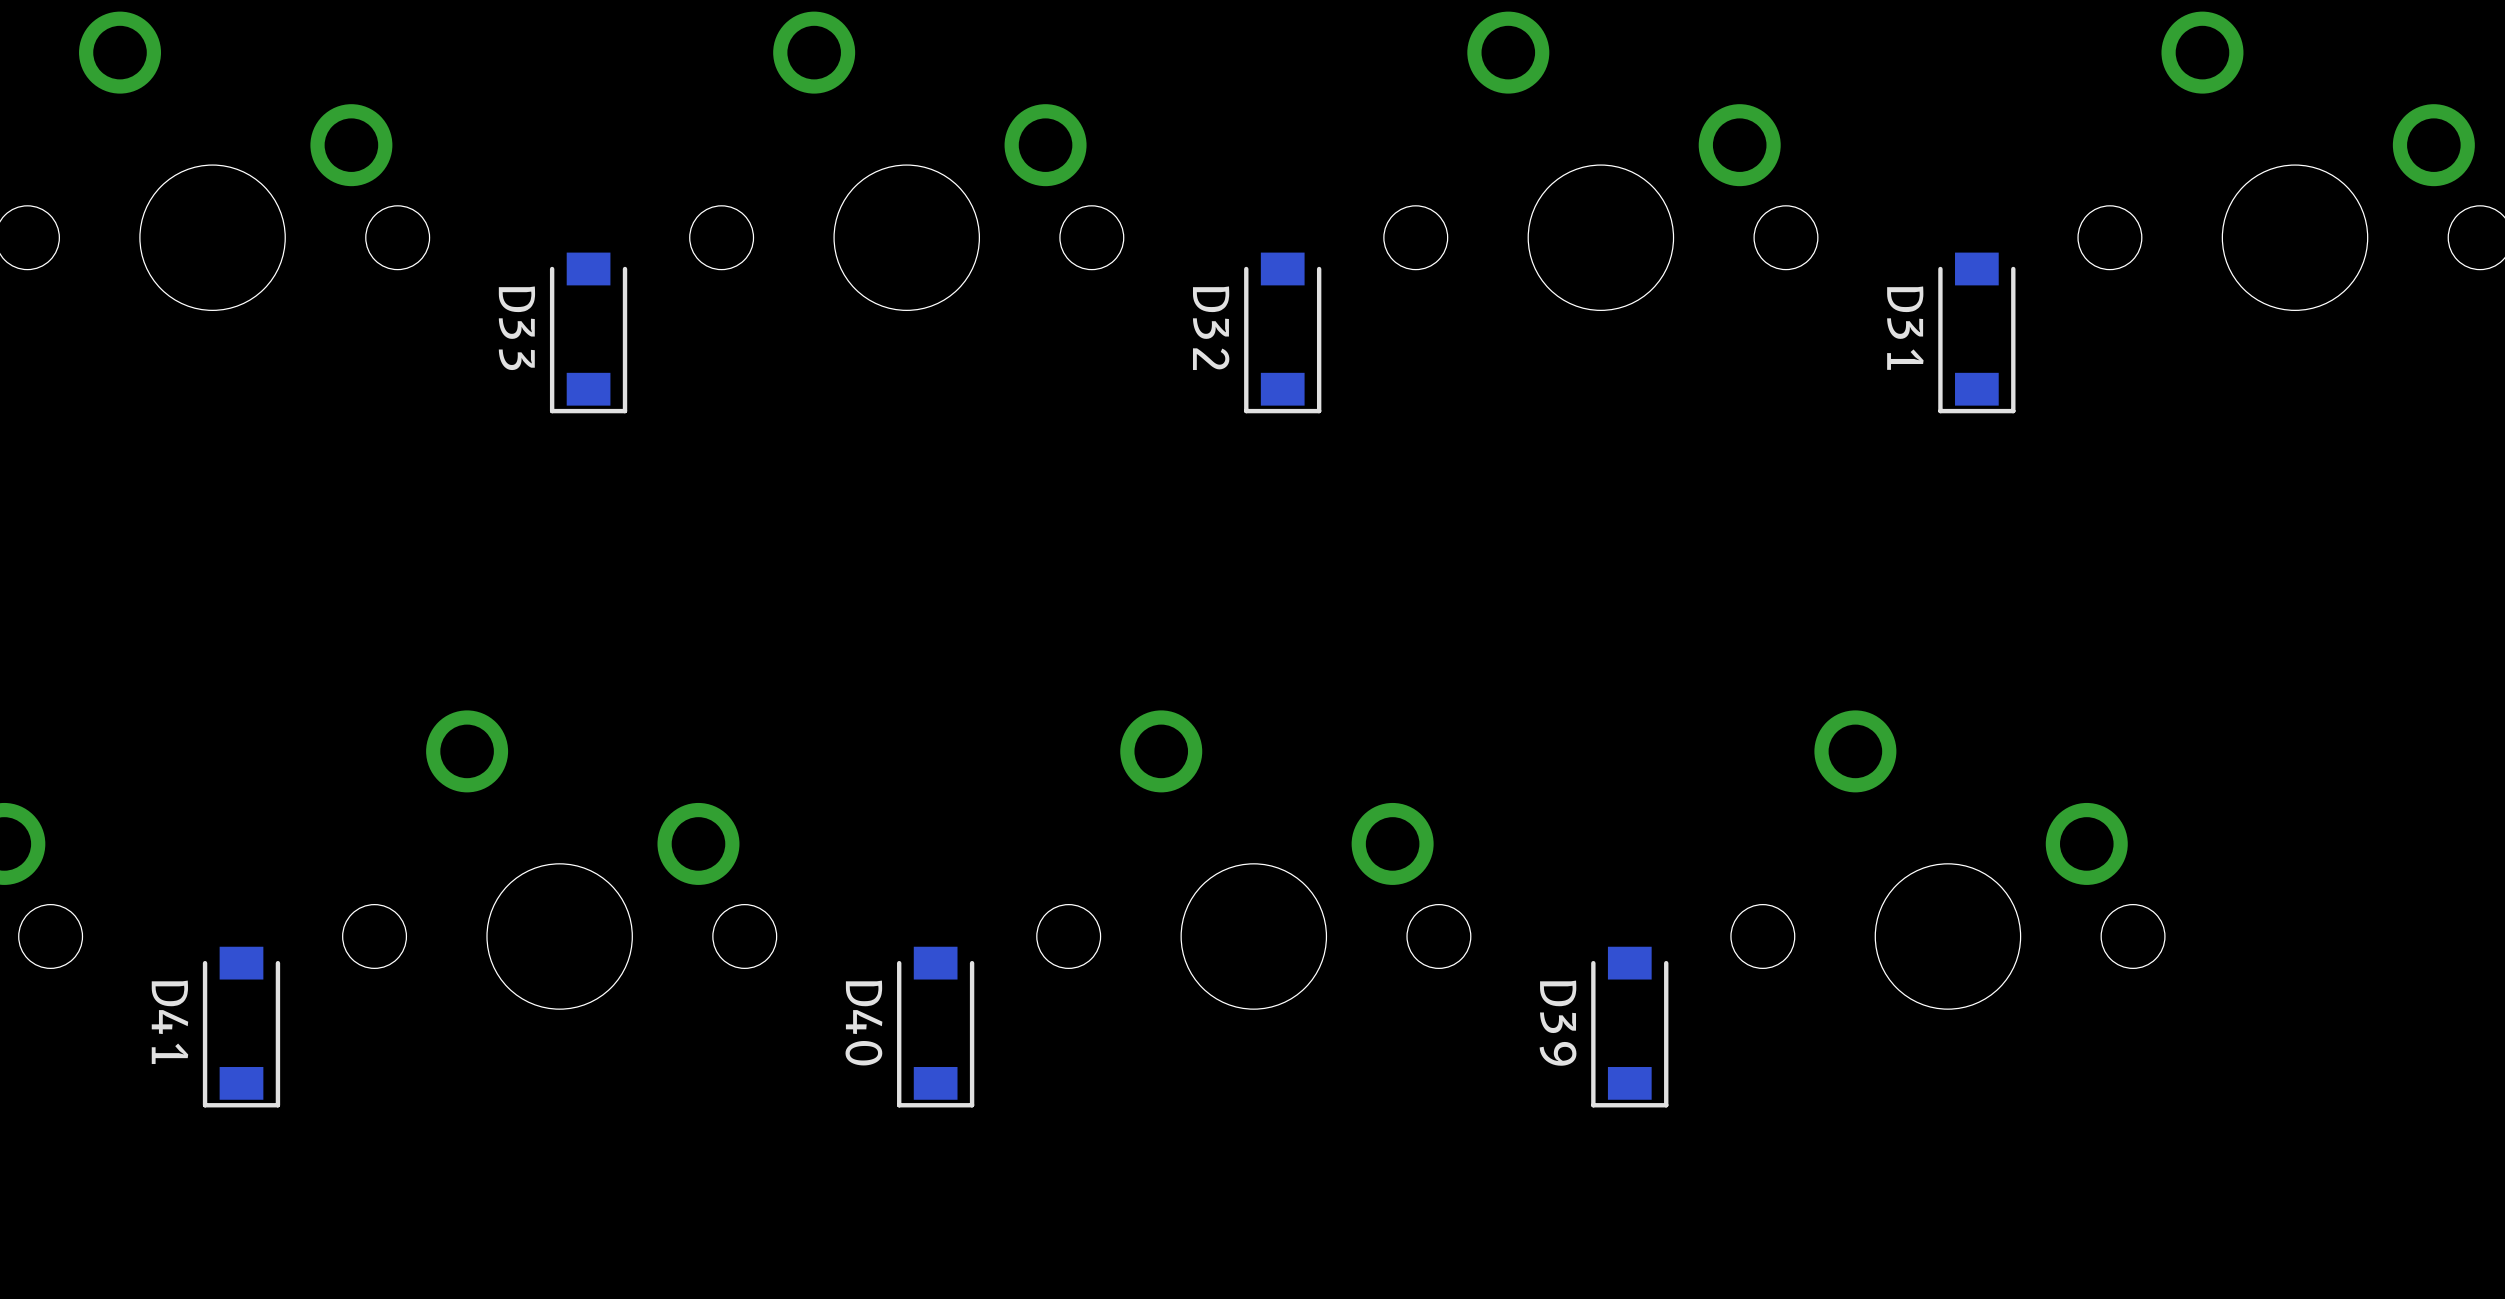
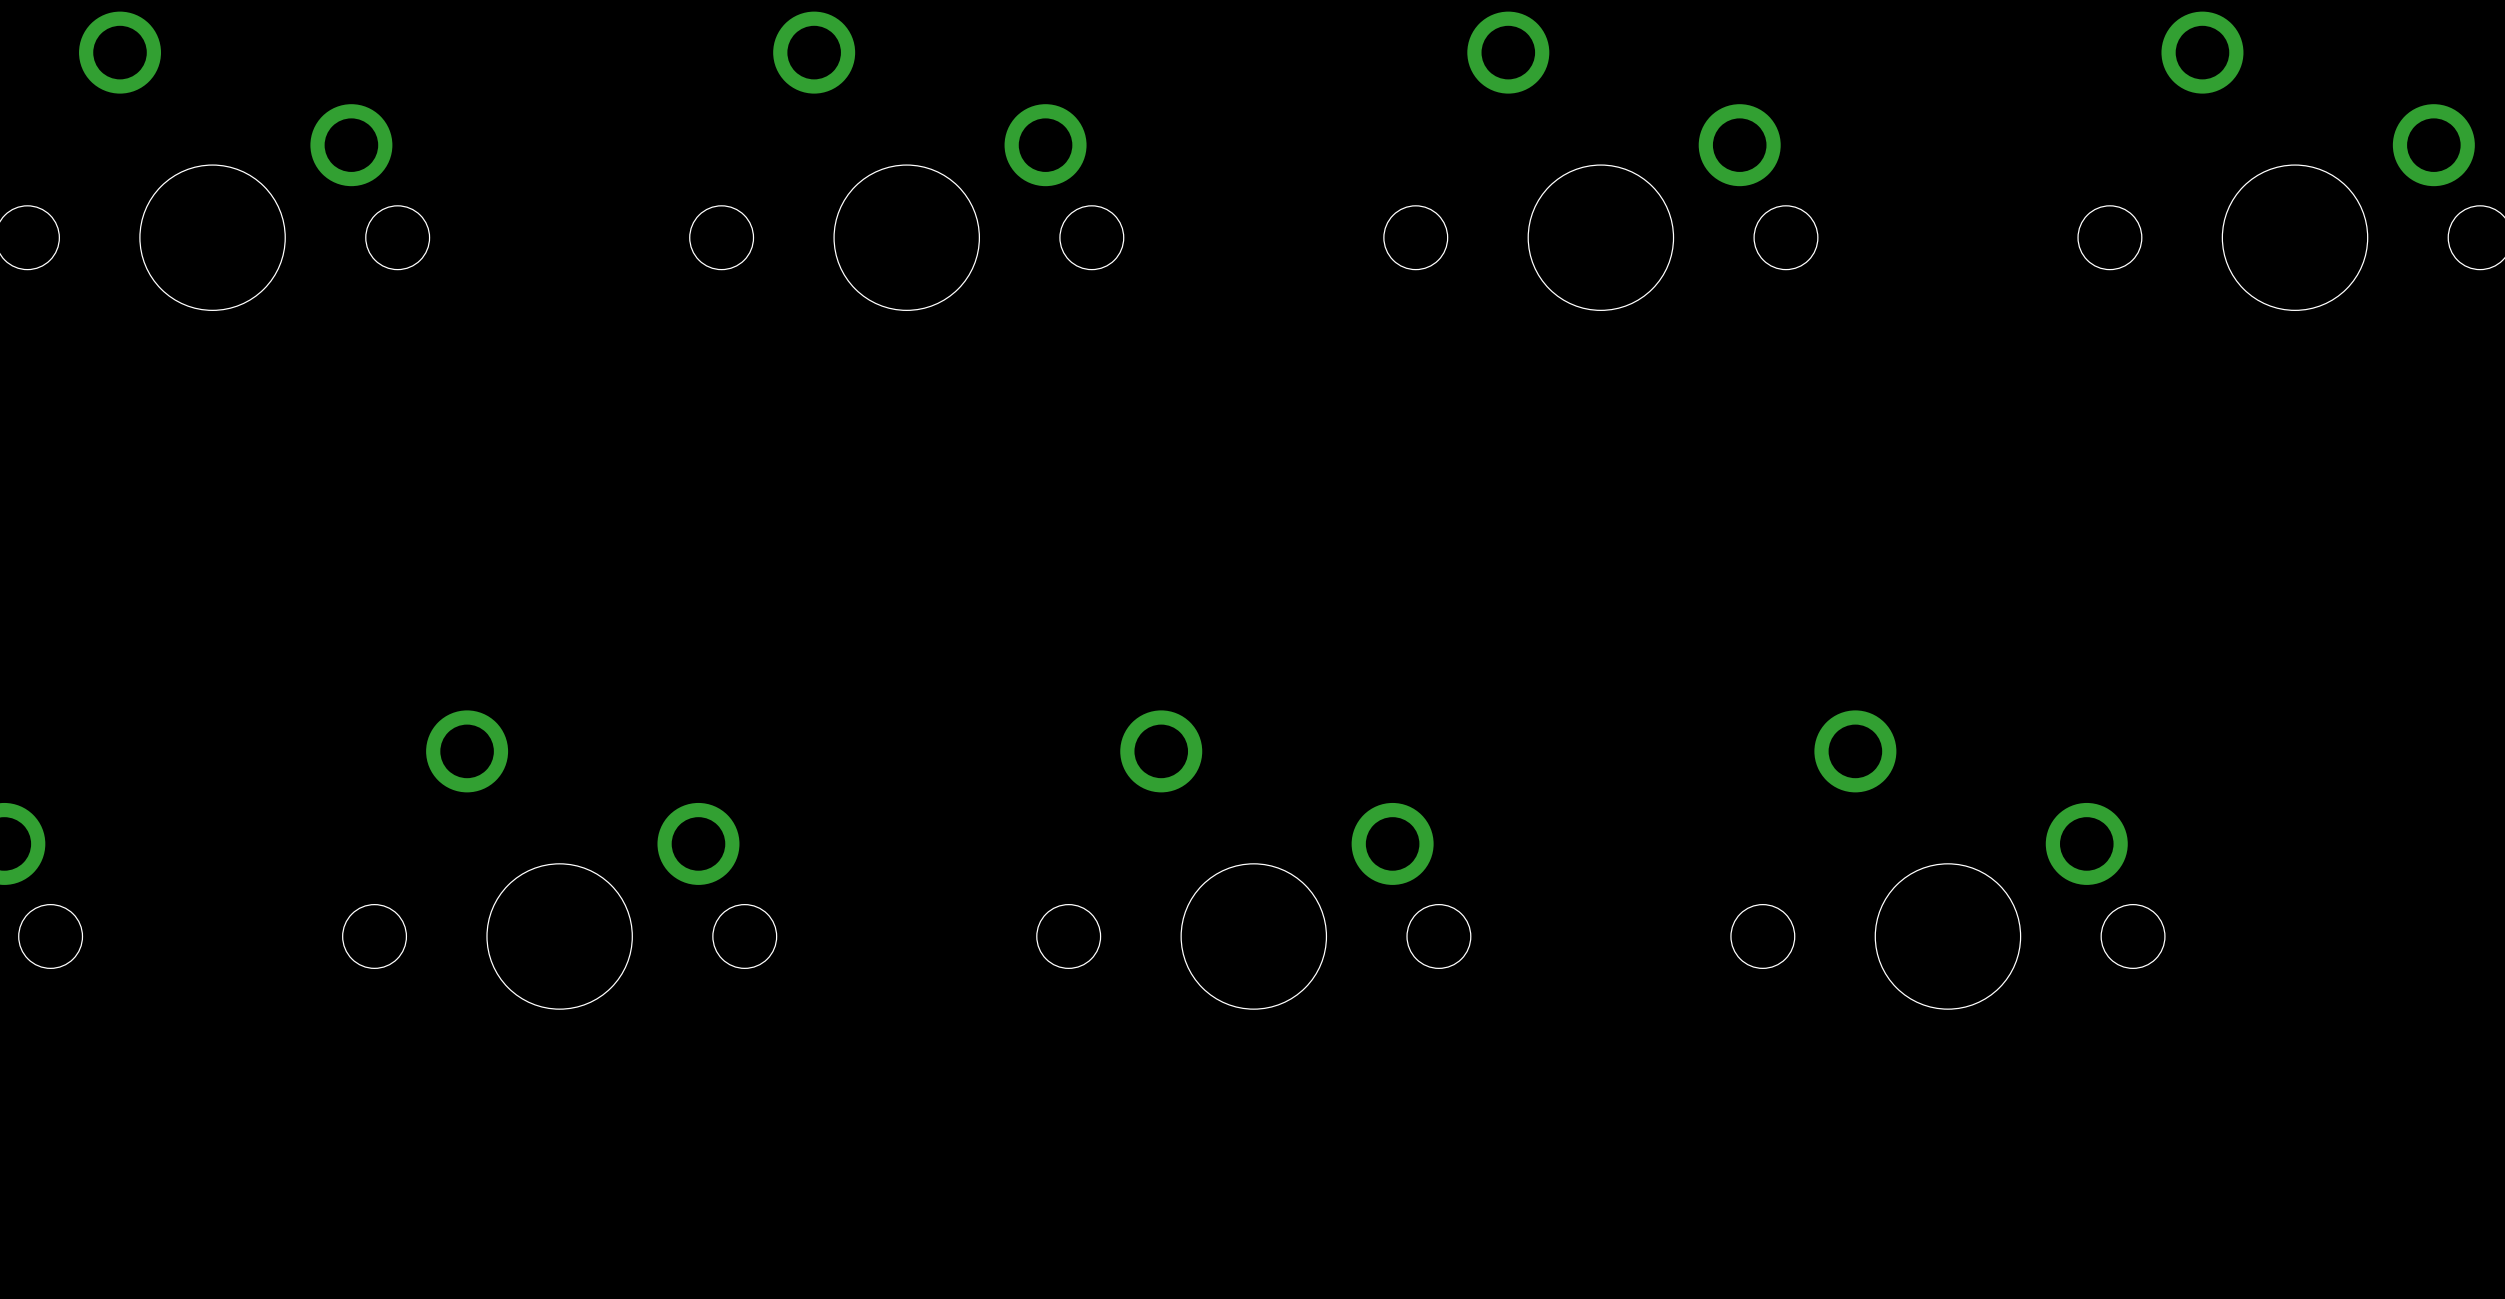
D33: (588, 332) -> none
D32: (1282, 332) -> none
D31: (1976, 332) -> none
D41: (241, 1027) -> none
D40: (935, 1027) -> none
D39: (1629, 1027) -> none

